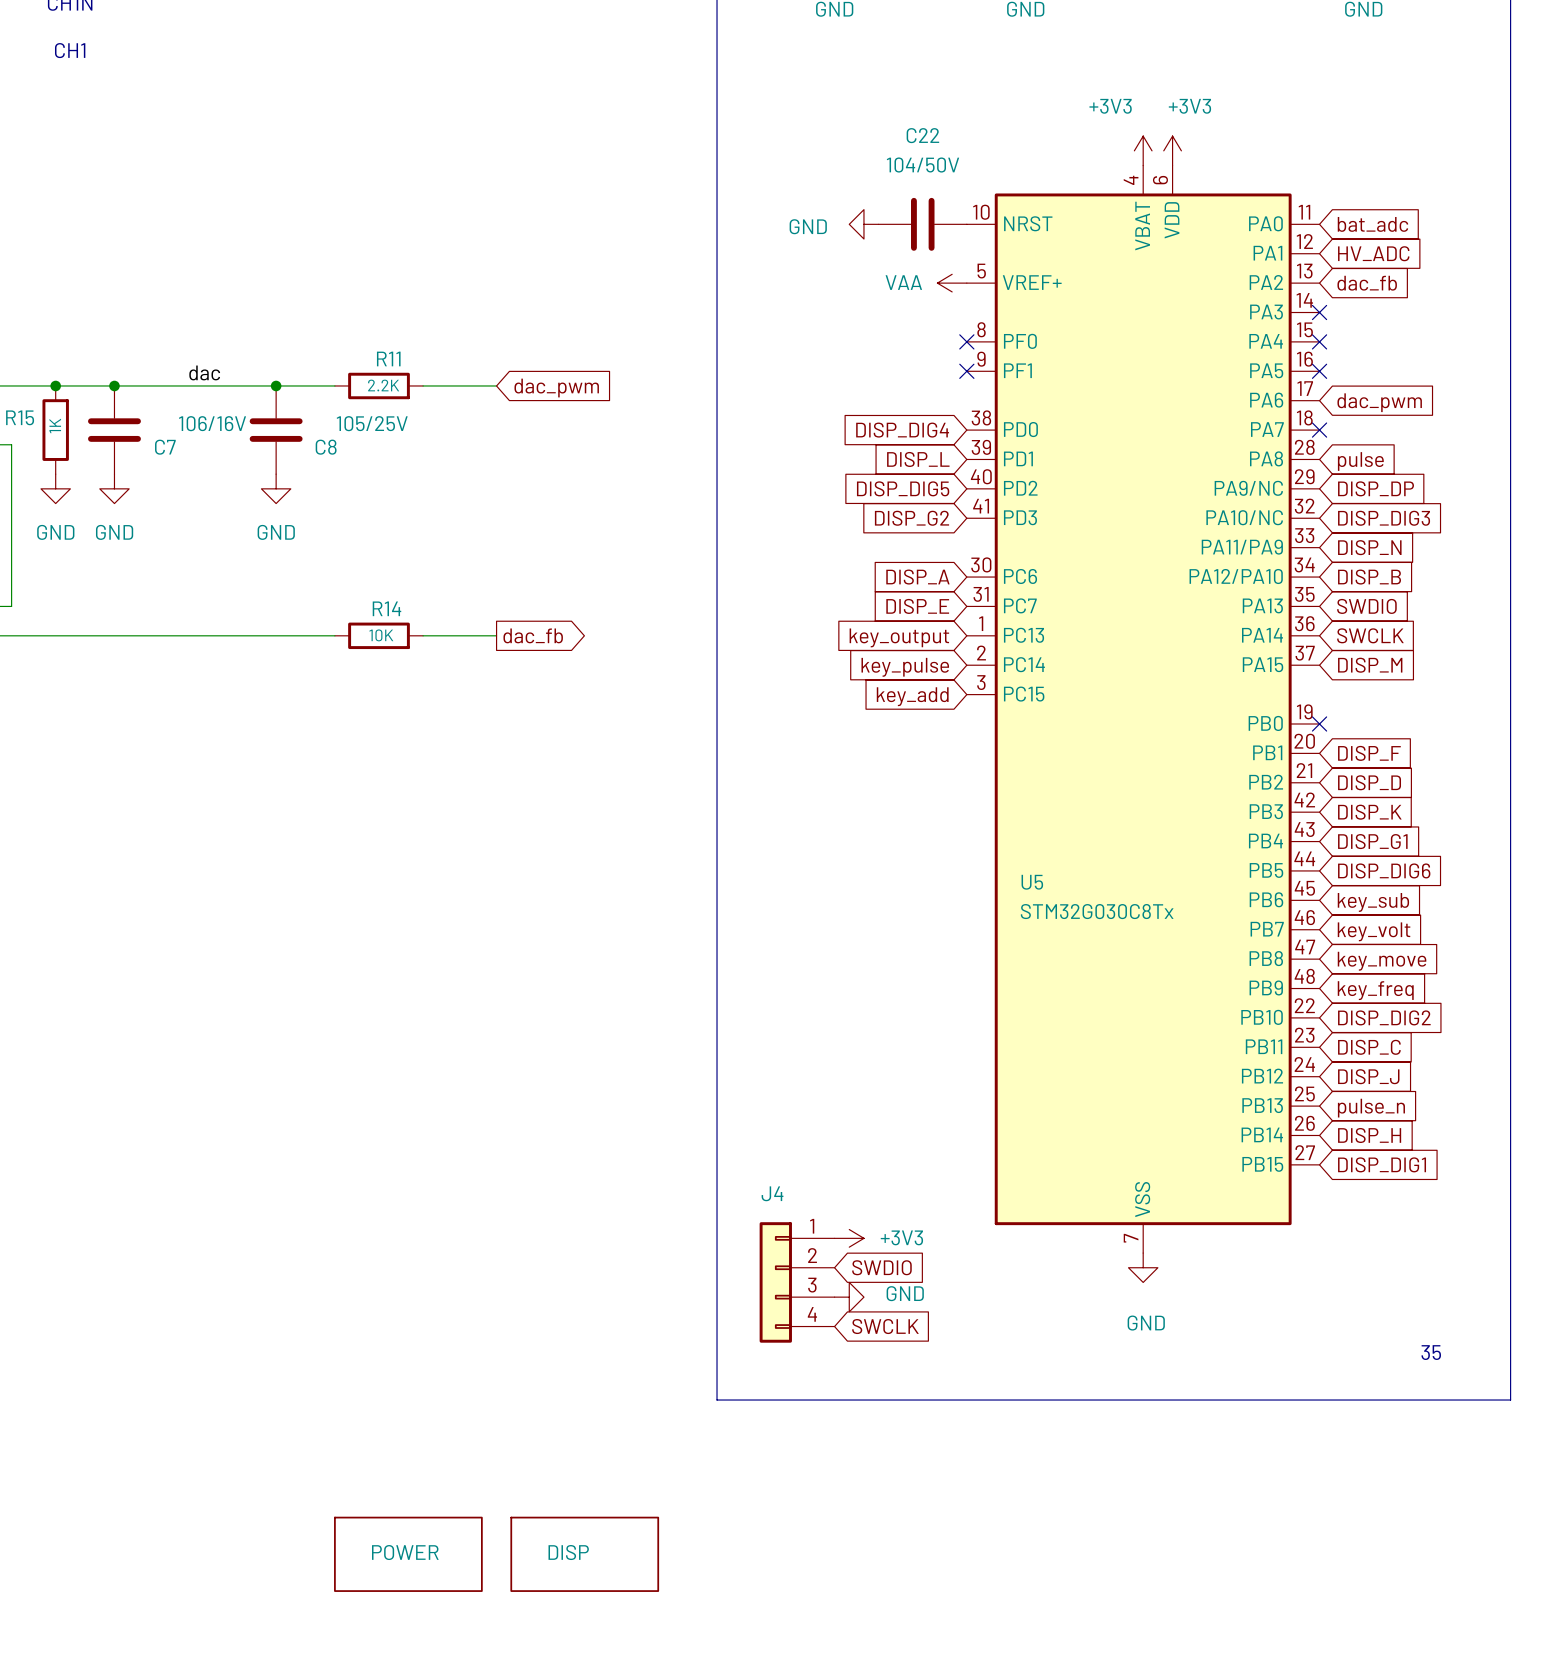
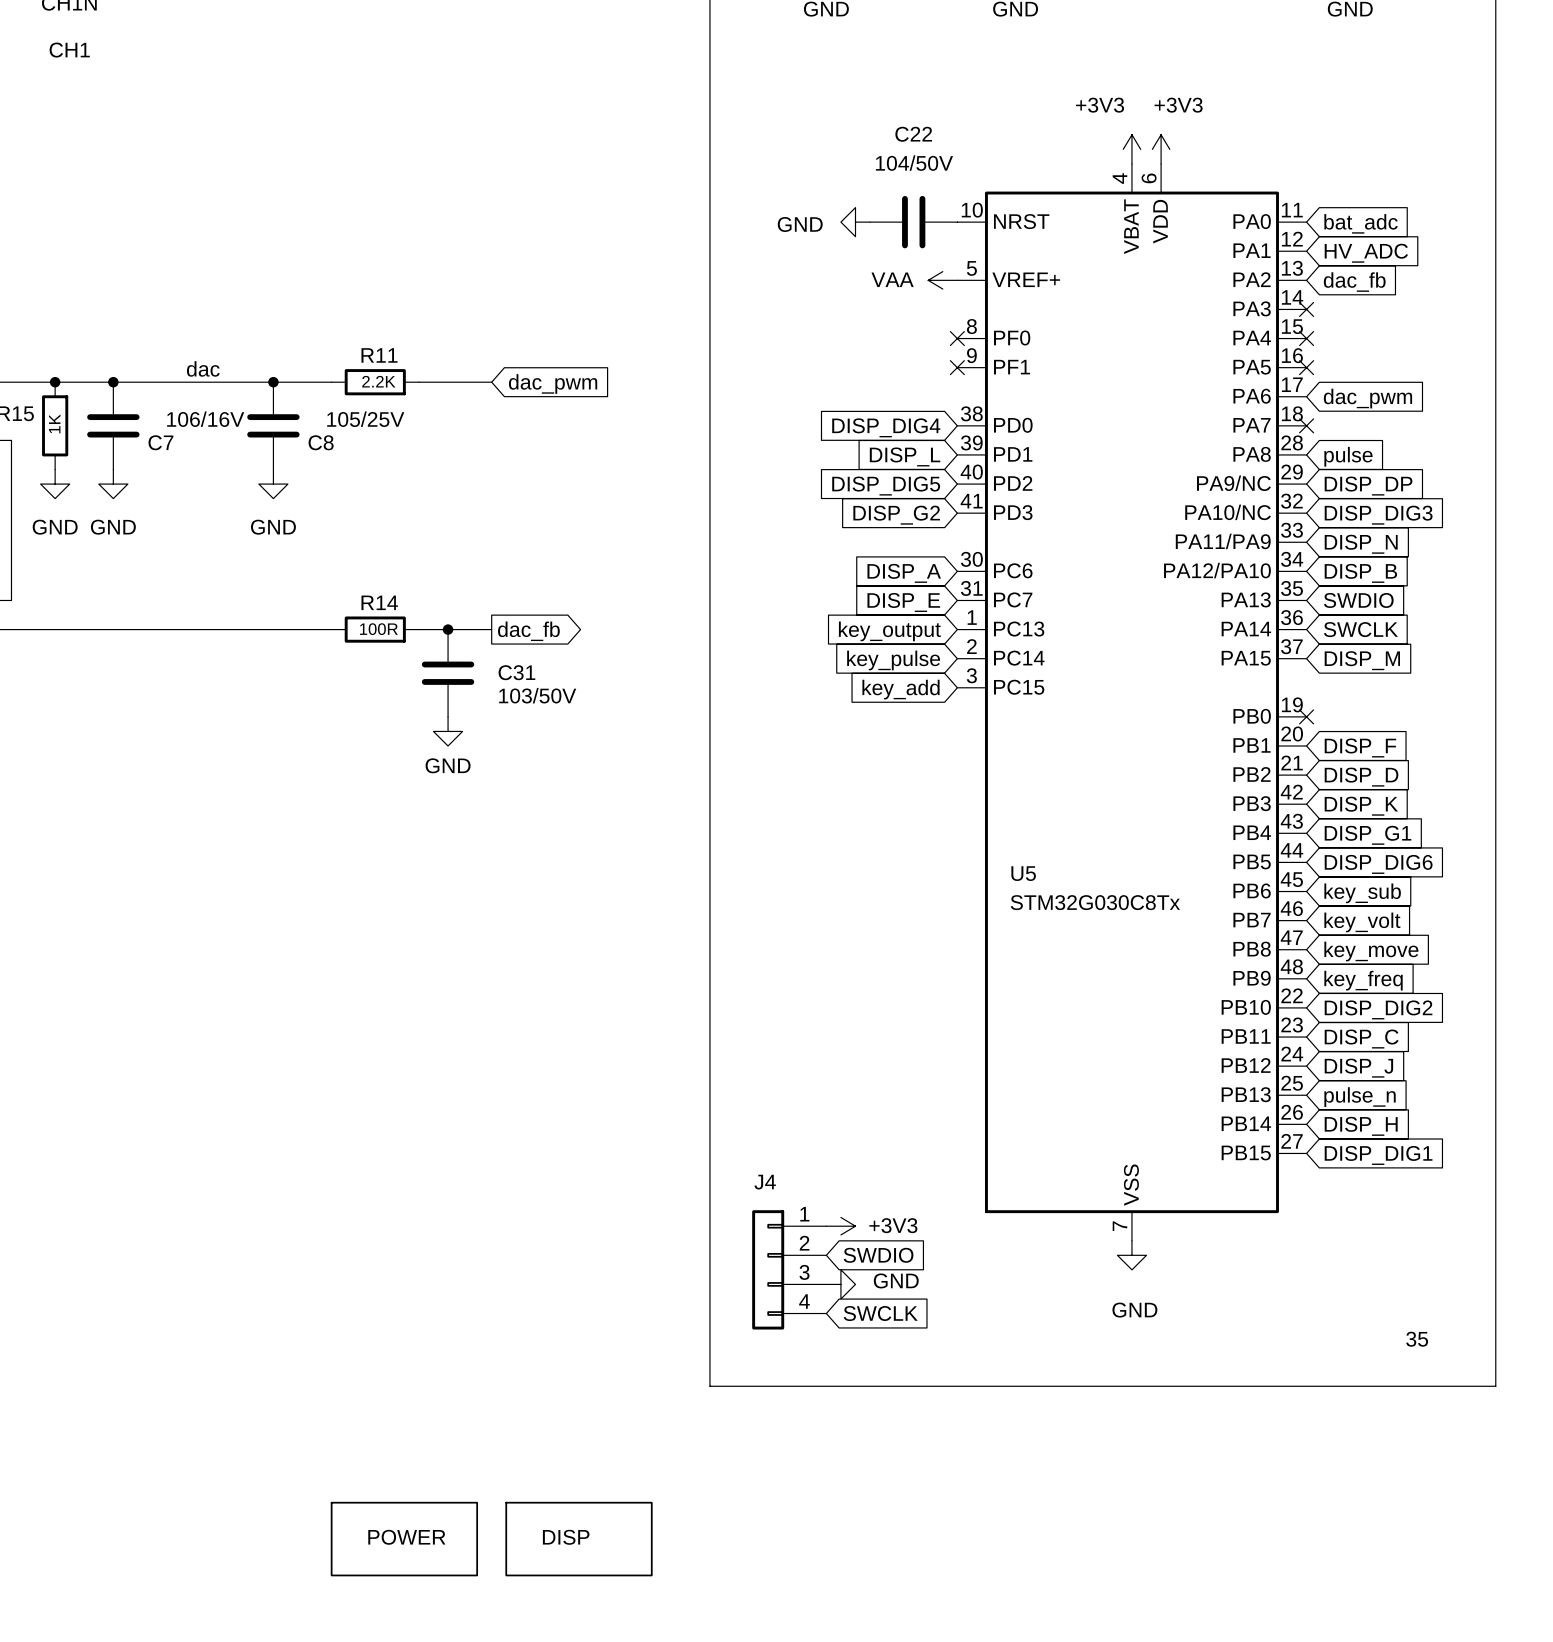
R14 value: 10K (381, 635) -> 100R (378, 629)
junction: none -> (448, 629)
C31: none -> 103/50V (448, 673)
power symbol: none -> GND (448, 731)

